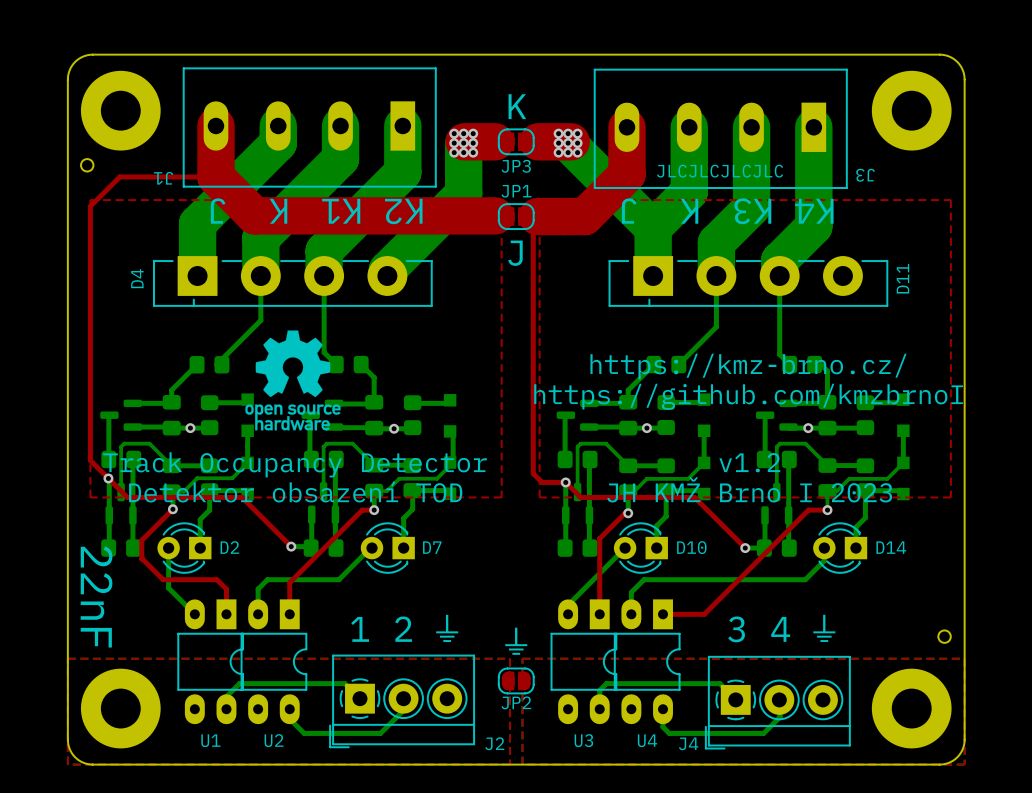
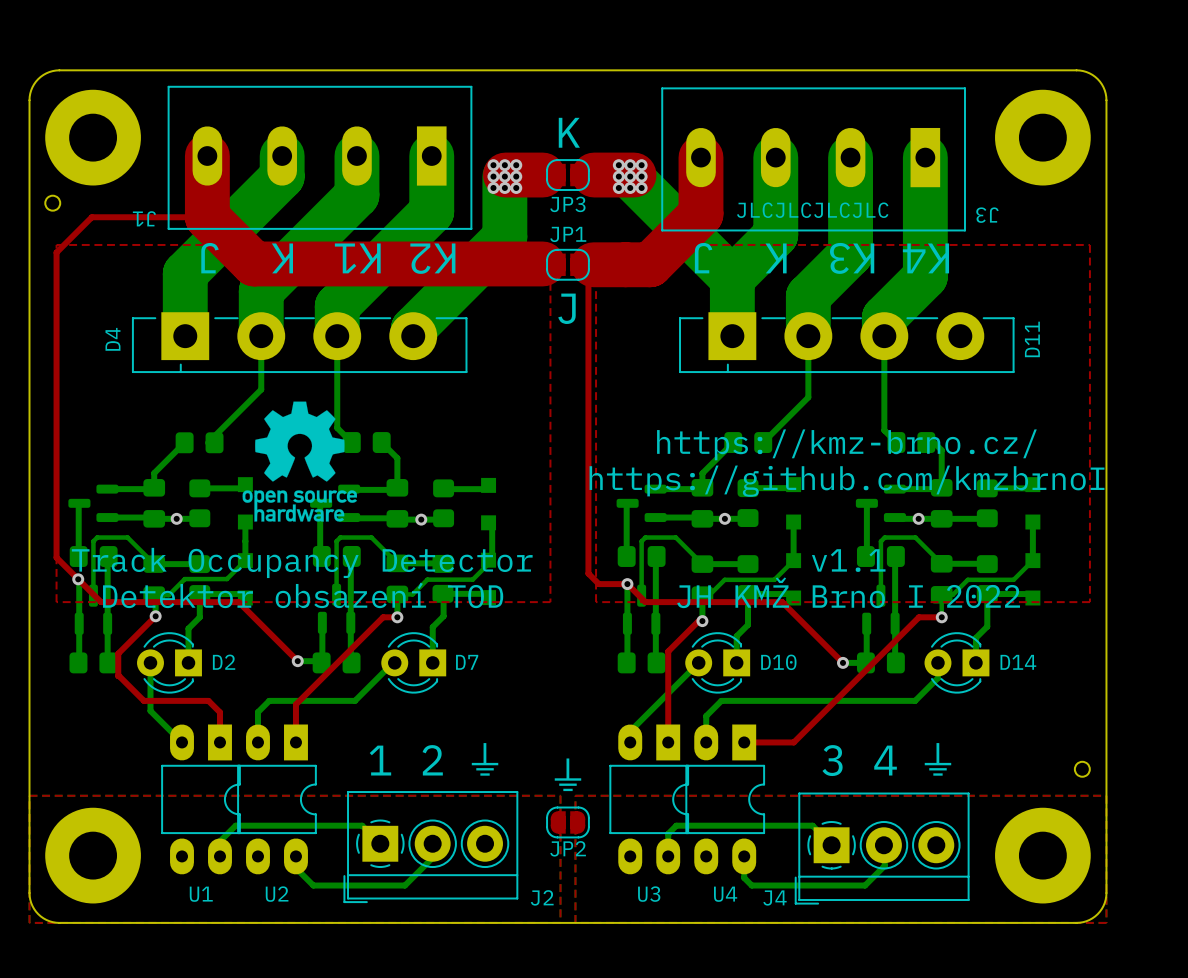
text: v1.2 (749, 462) -> v1.1 (848, 560)
text: JH KMŽ Brno I 2023 (749, 489) -> JH KMŽ Brno I 2022 (848, 592)
text: 22nF (96, 596) -> none

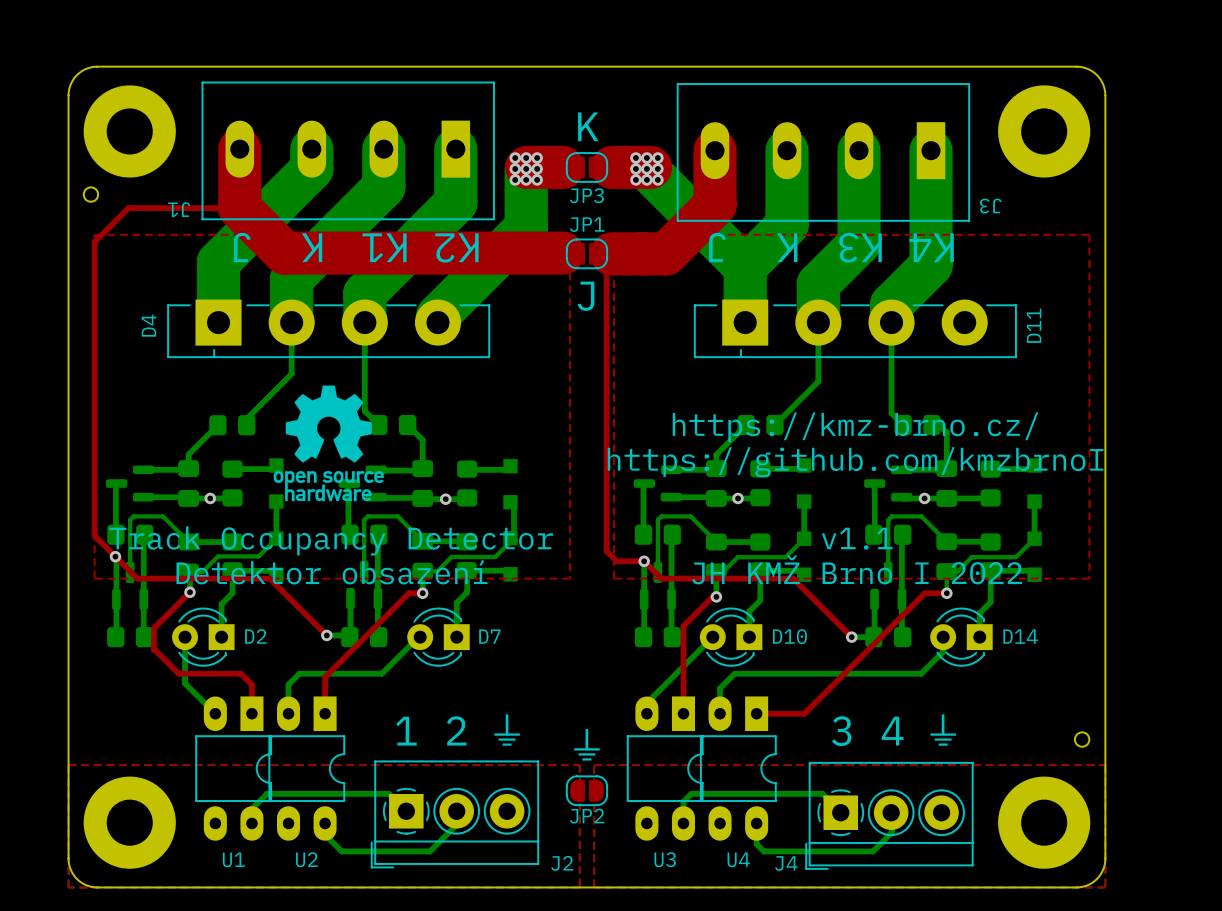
text: JLCJLCJLCJLC (812, 210) -> none
text: Detektor obsazení TOD (303, 595) -> Detektor obsazení (331, 572)

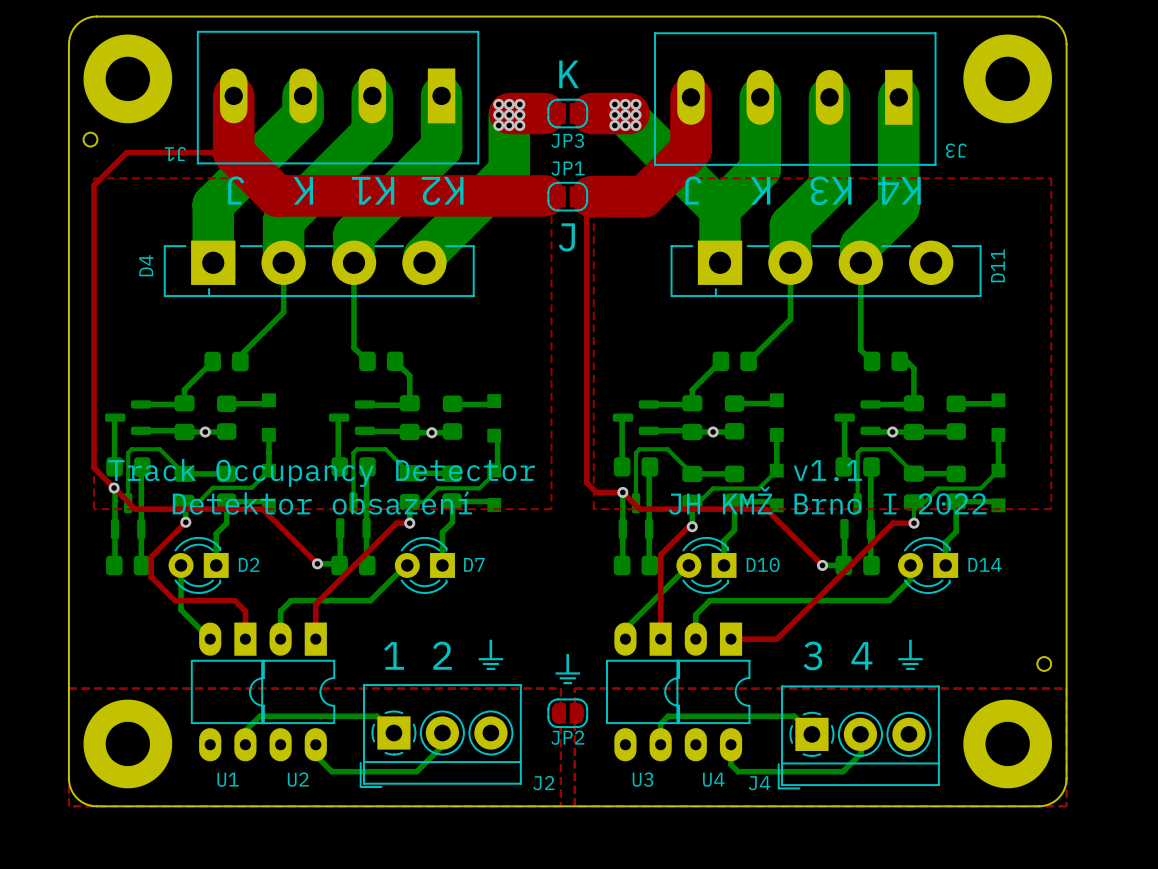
drawing: [273, 385, 384, 502] -> none
text: https://kmz-brno.cz/ (855, 427) -> none
text: https://github.com/kmzbrnoI (855, 462) -> none

